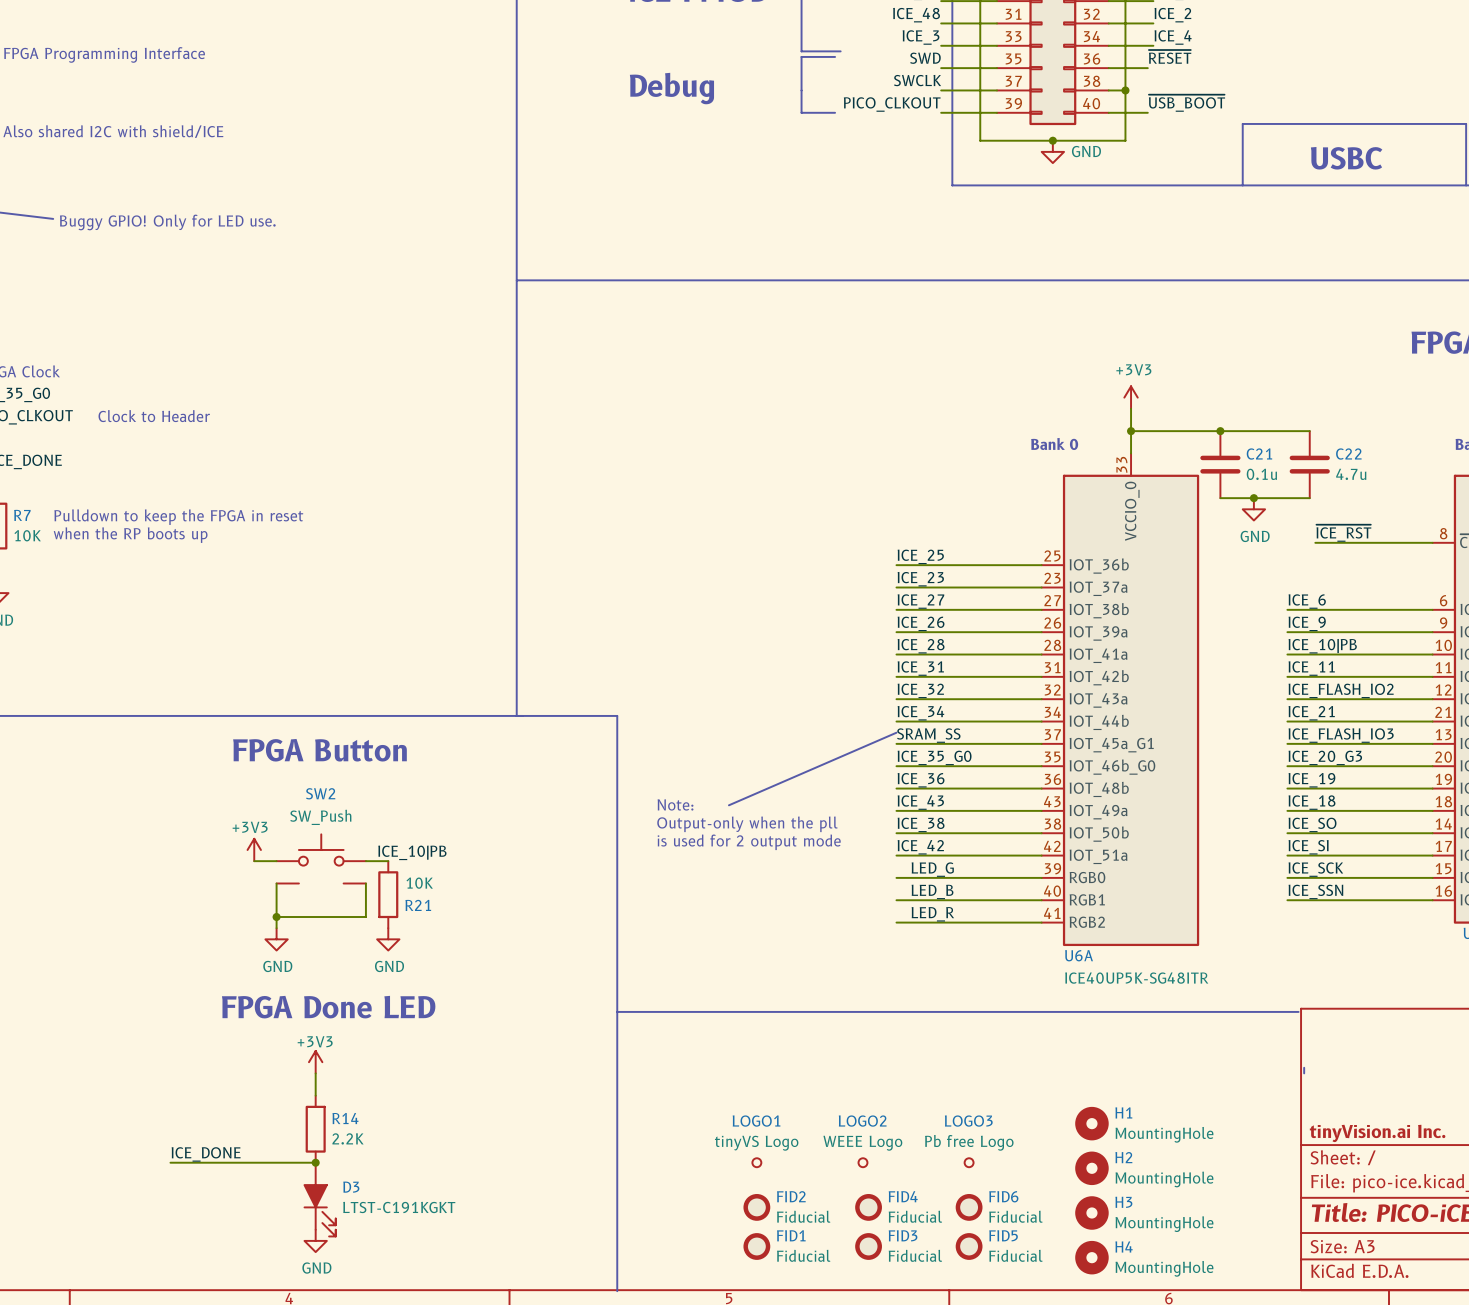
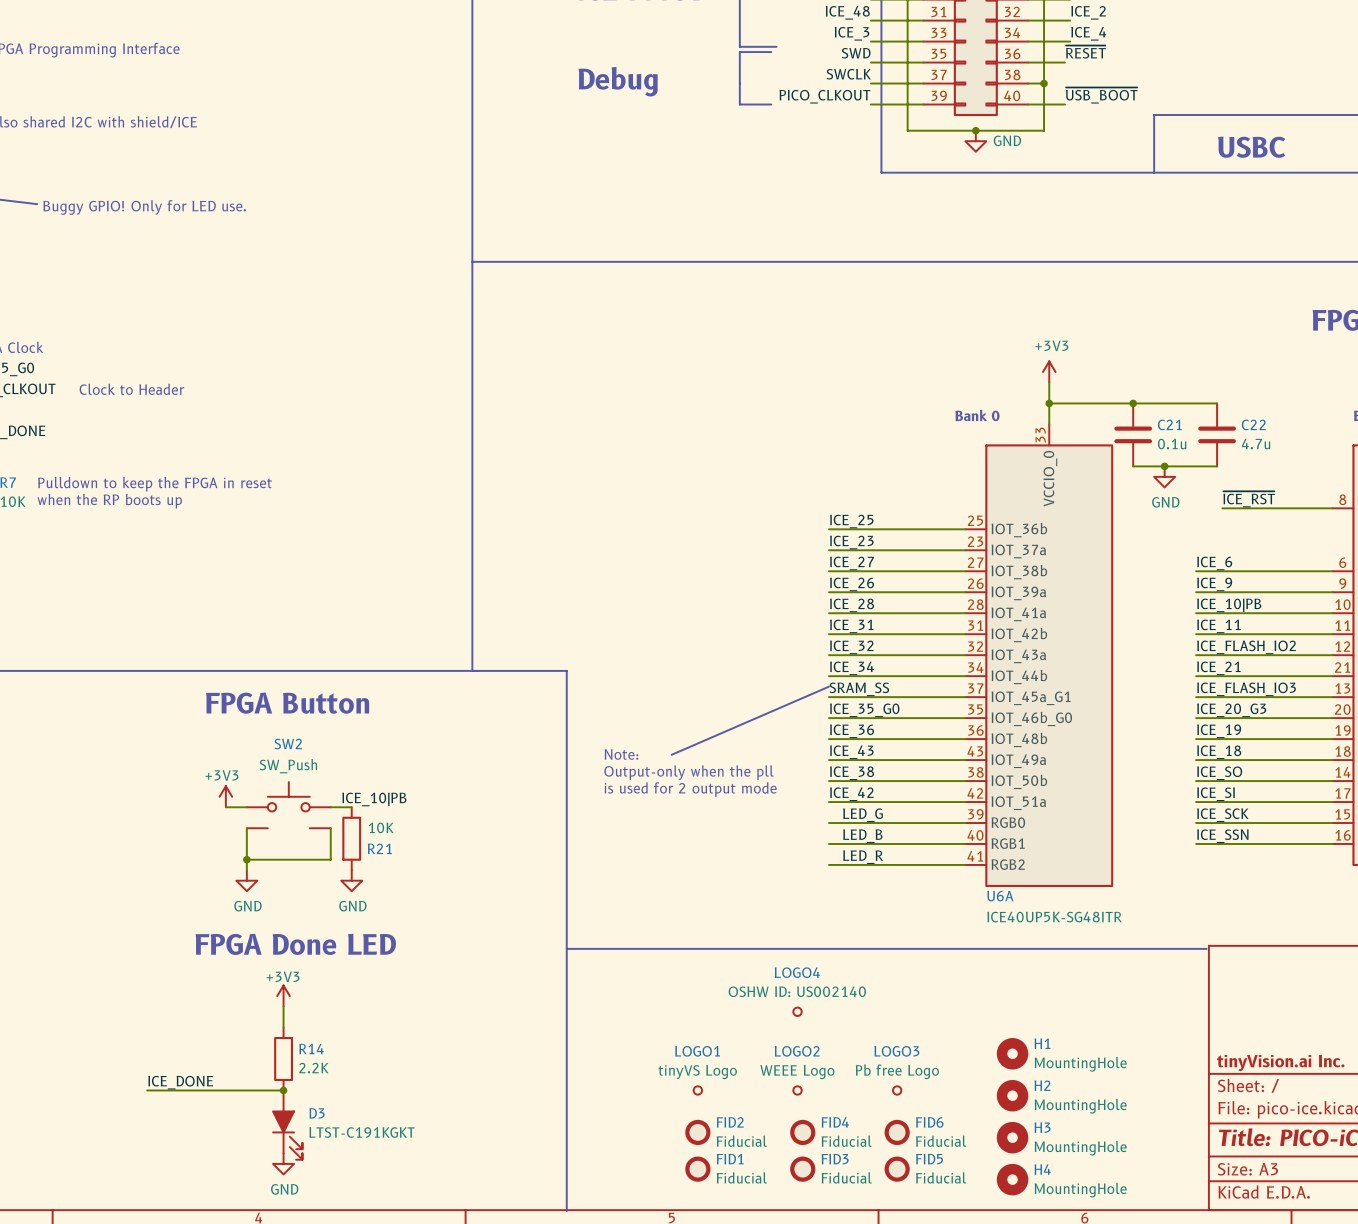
line: (1304, 1067) (1304, 1073) -> none
LOGO4: none -> OSHW ID: US002140 (797, 1011)

